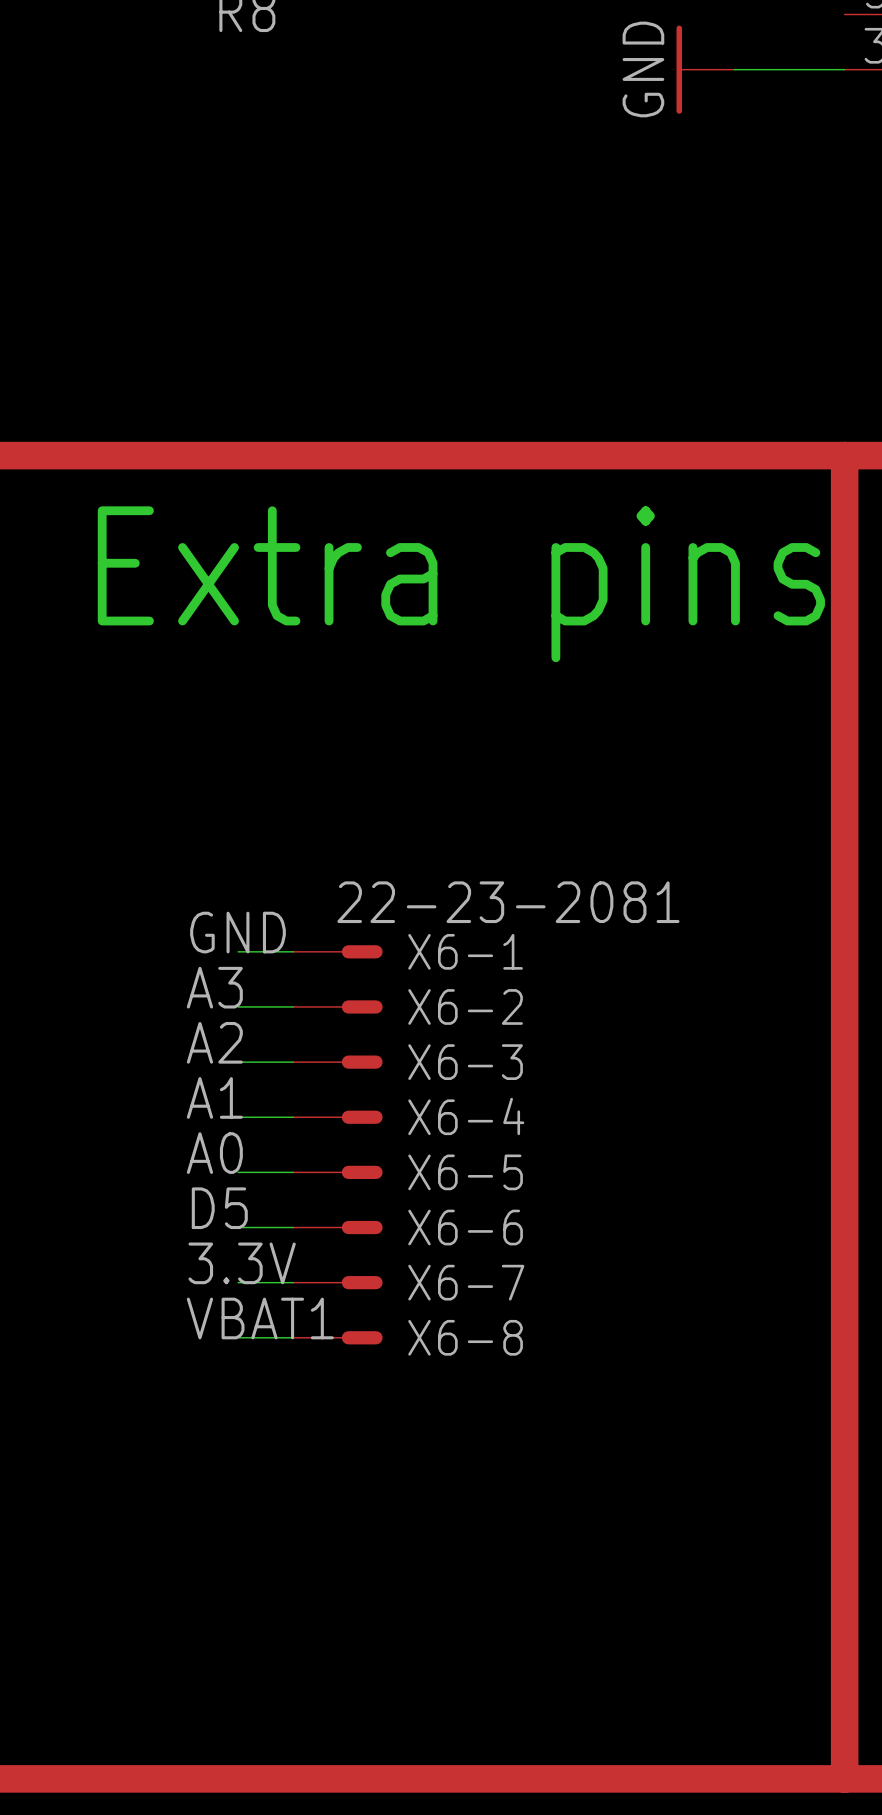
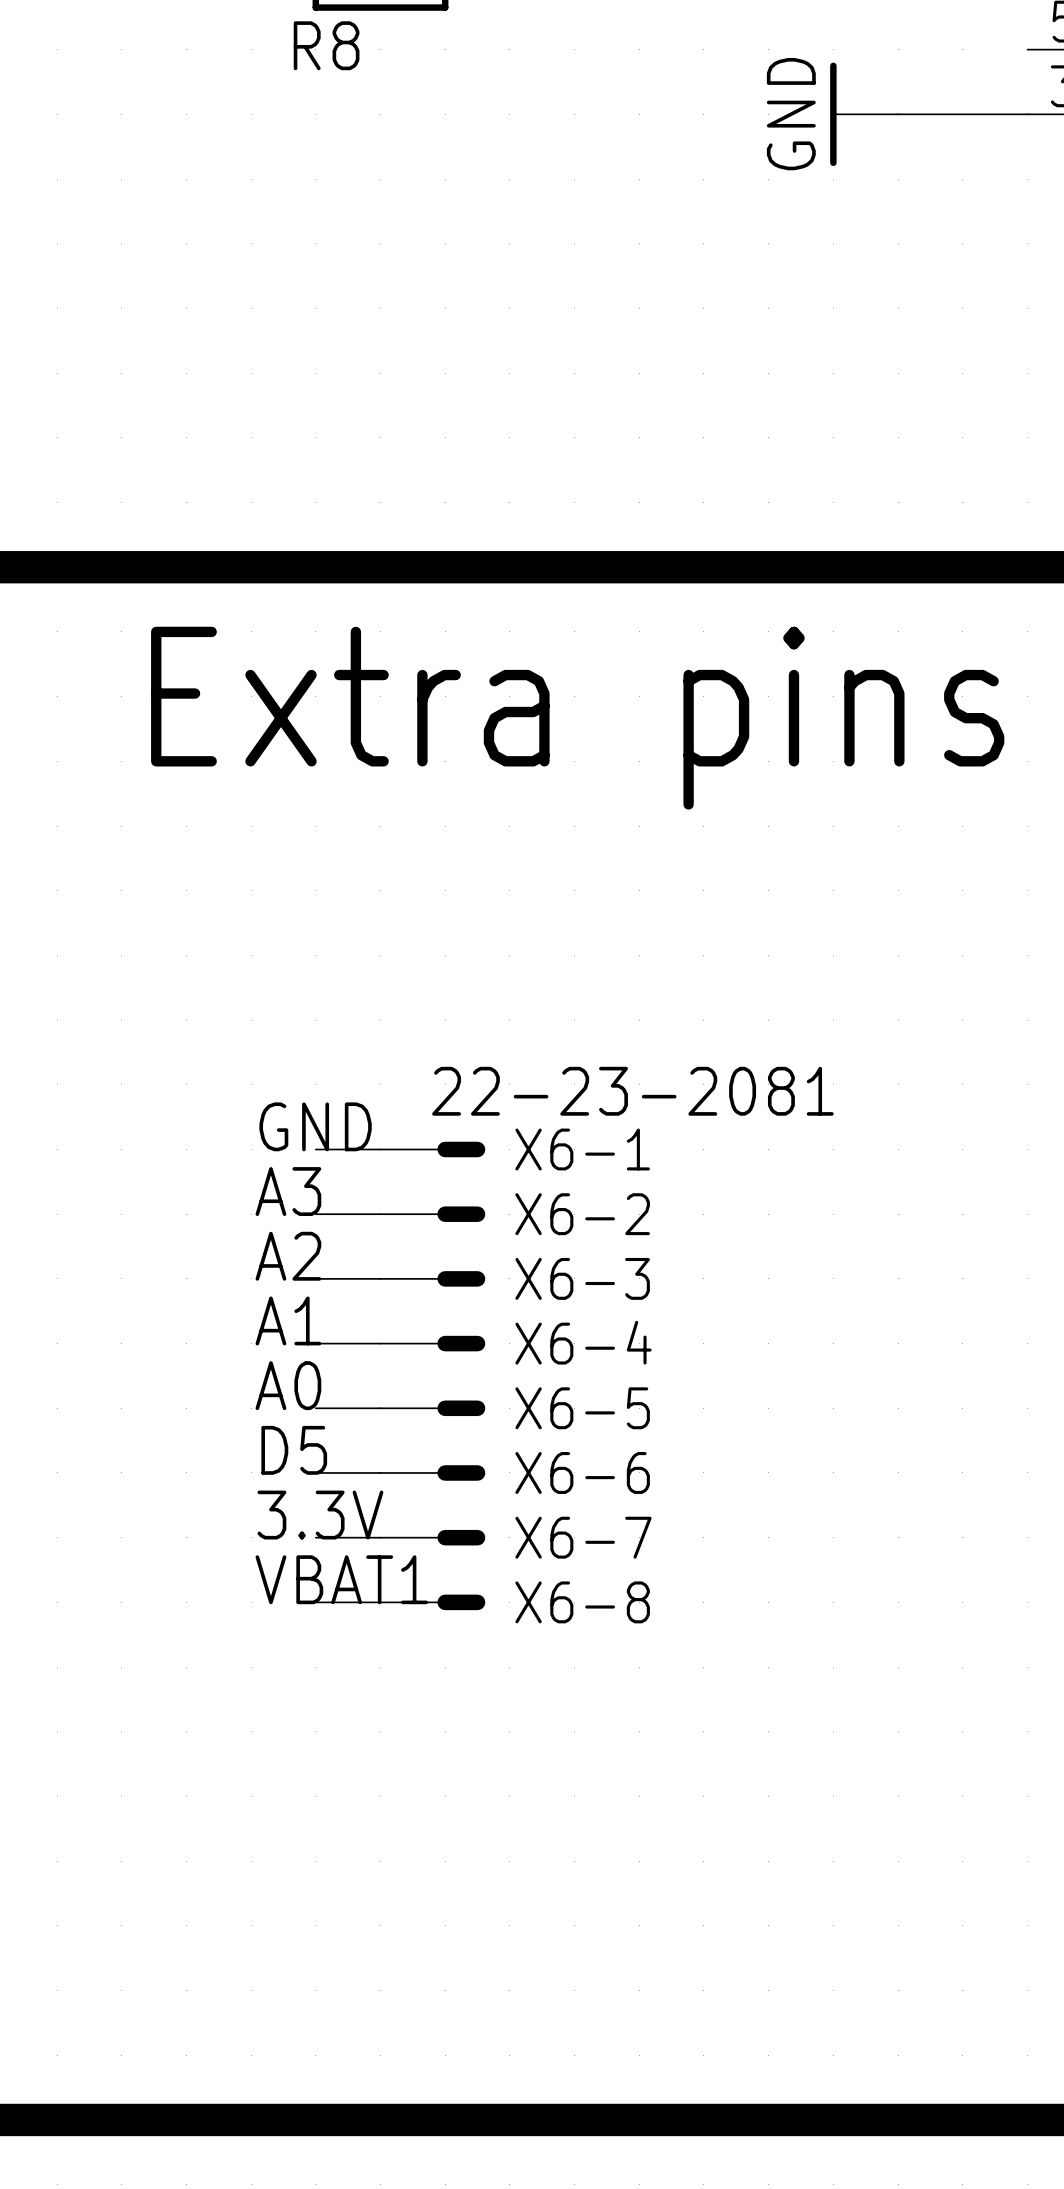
line: (844, 455) (844, 1778) -> none

